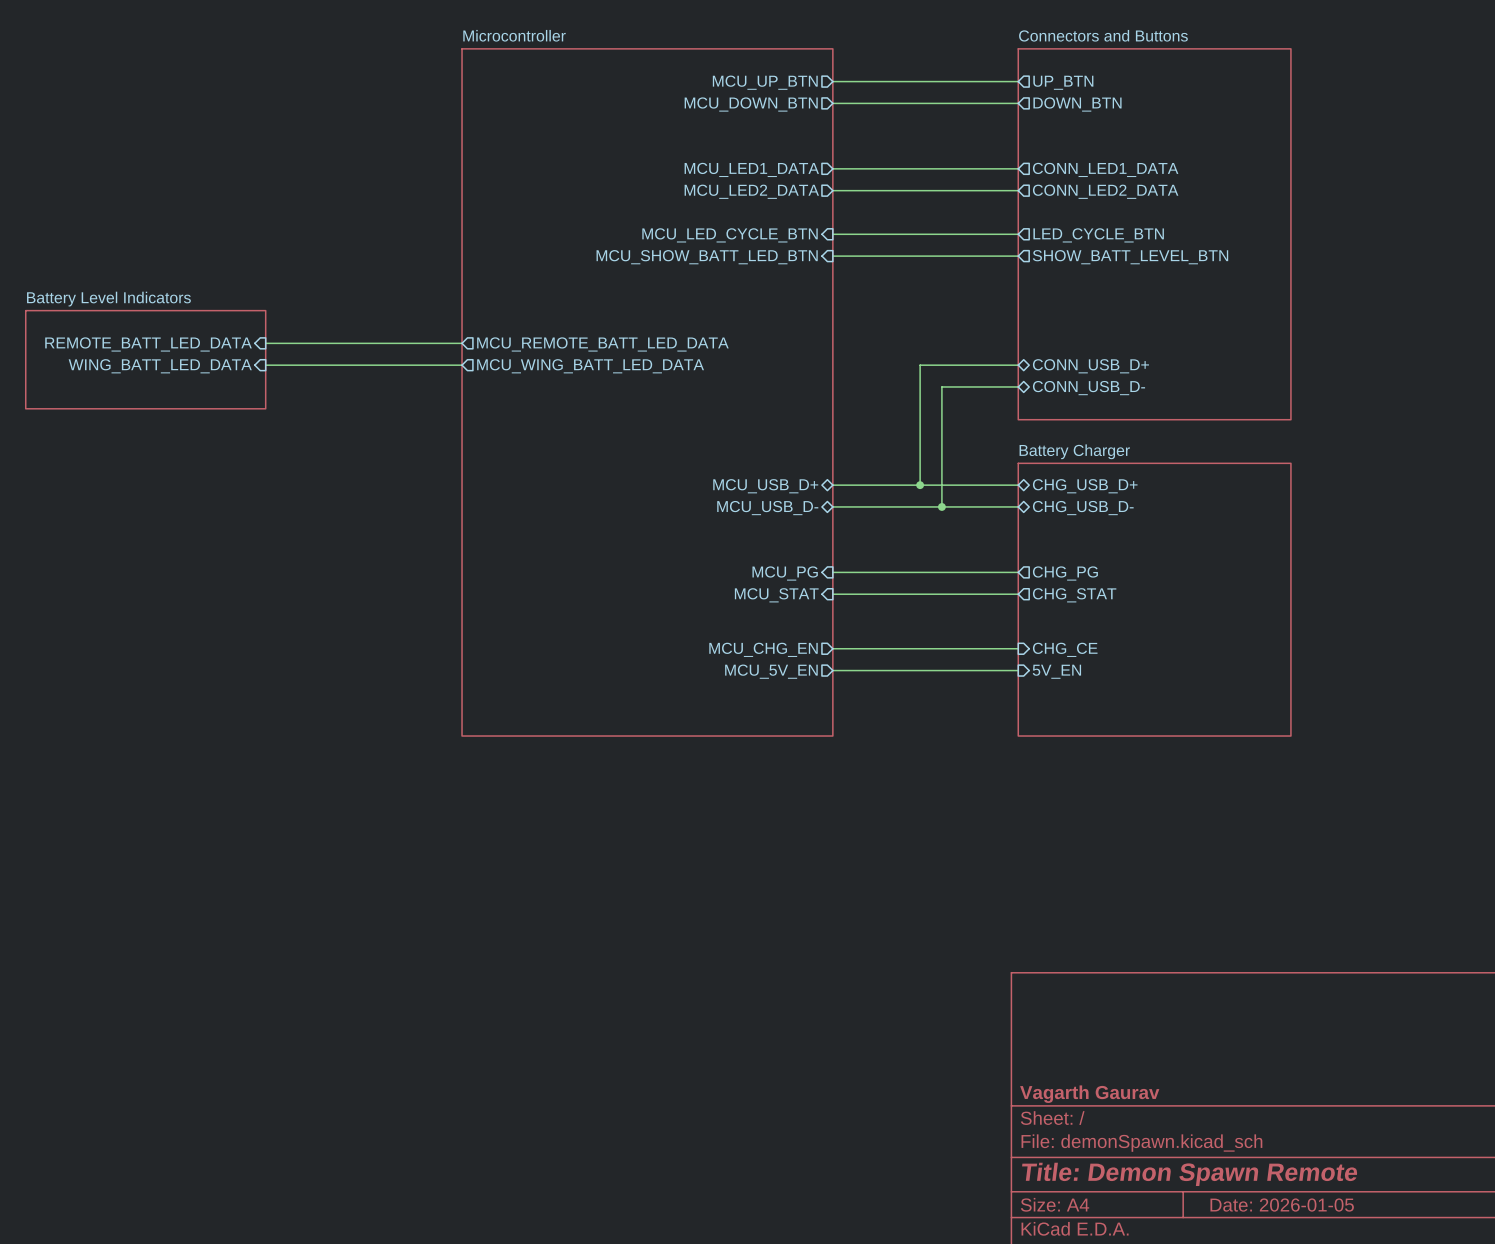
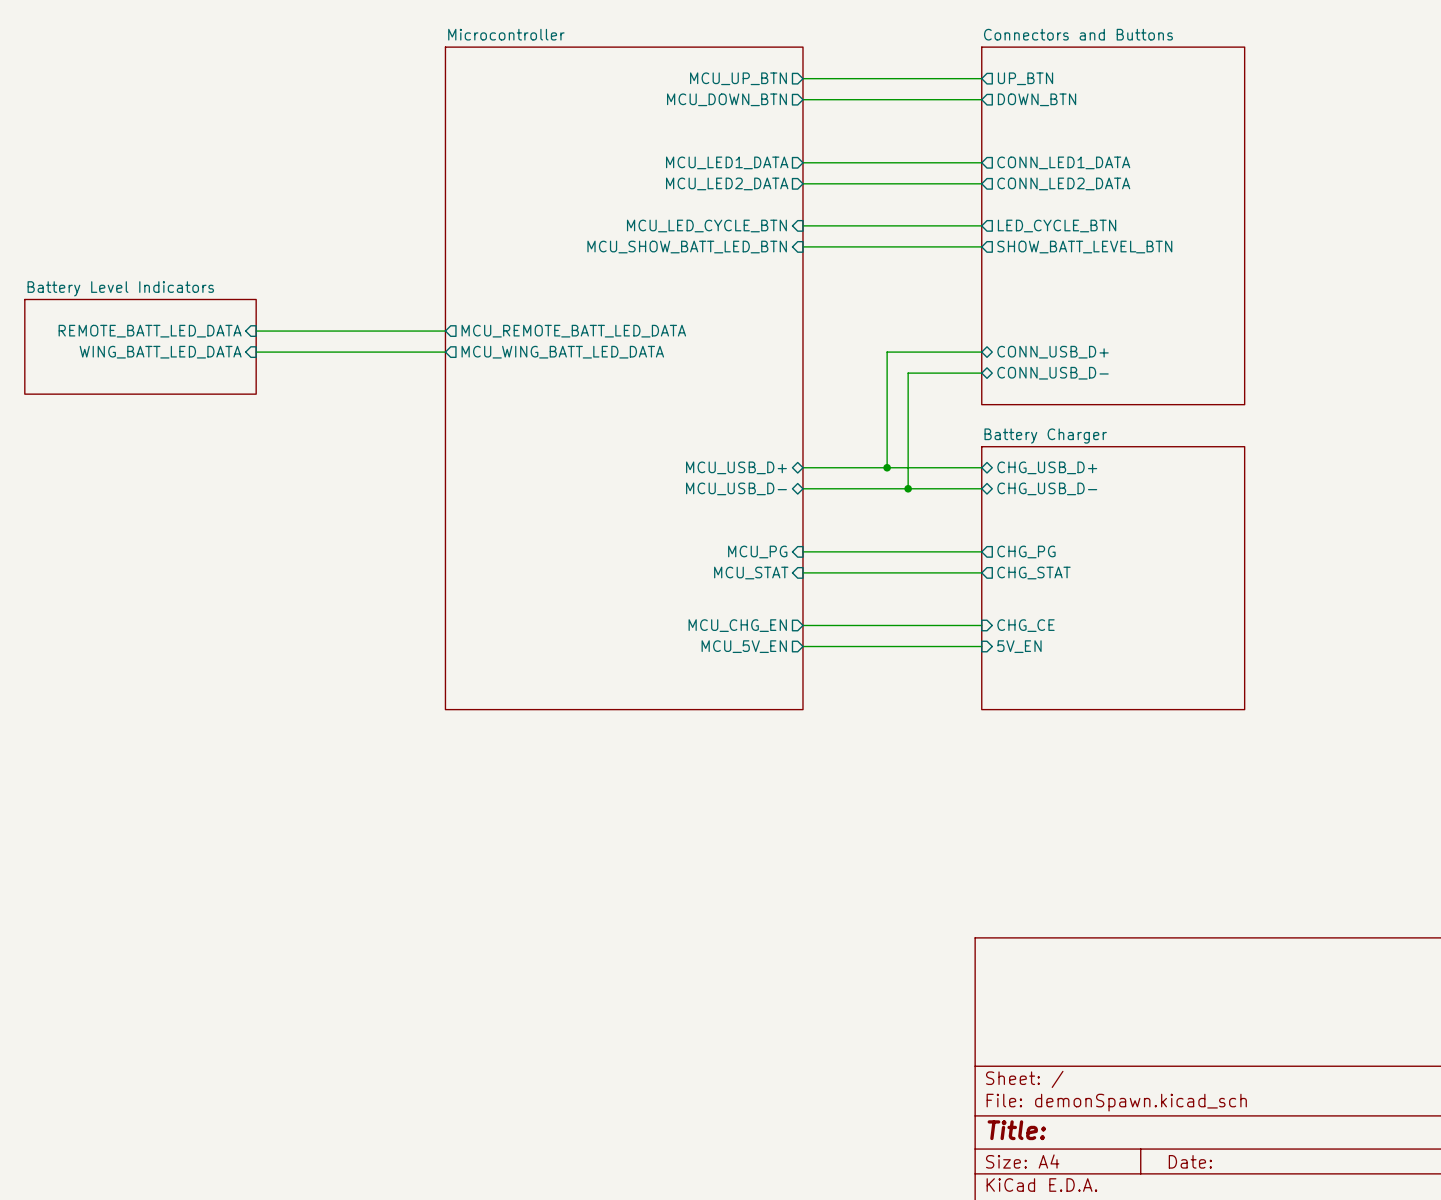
title block: Vagarth Gaurav (1089, 1094) -> none
title block: Title: Demon Spawn Remote (1189, 1174) -> Title: (1016, 1130)
title block: Date: 2026-01-05 (1282, 1205) -> Date: (1190, 1161)

